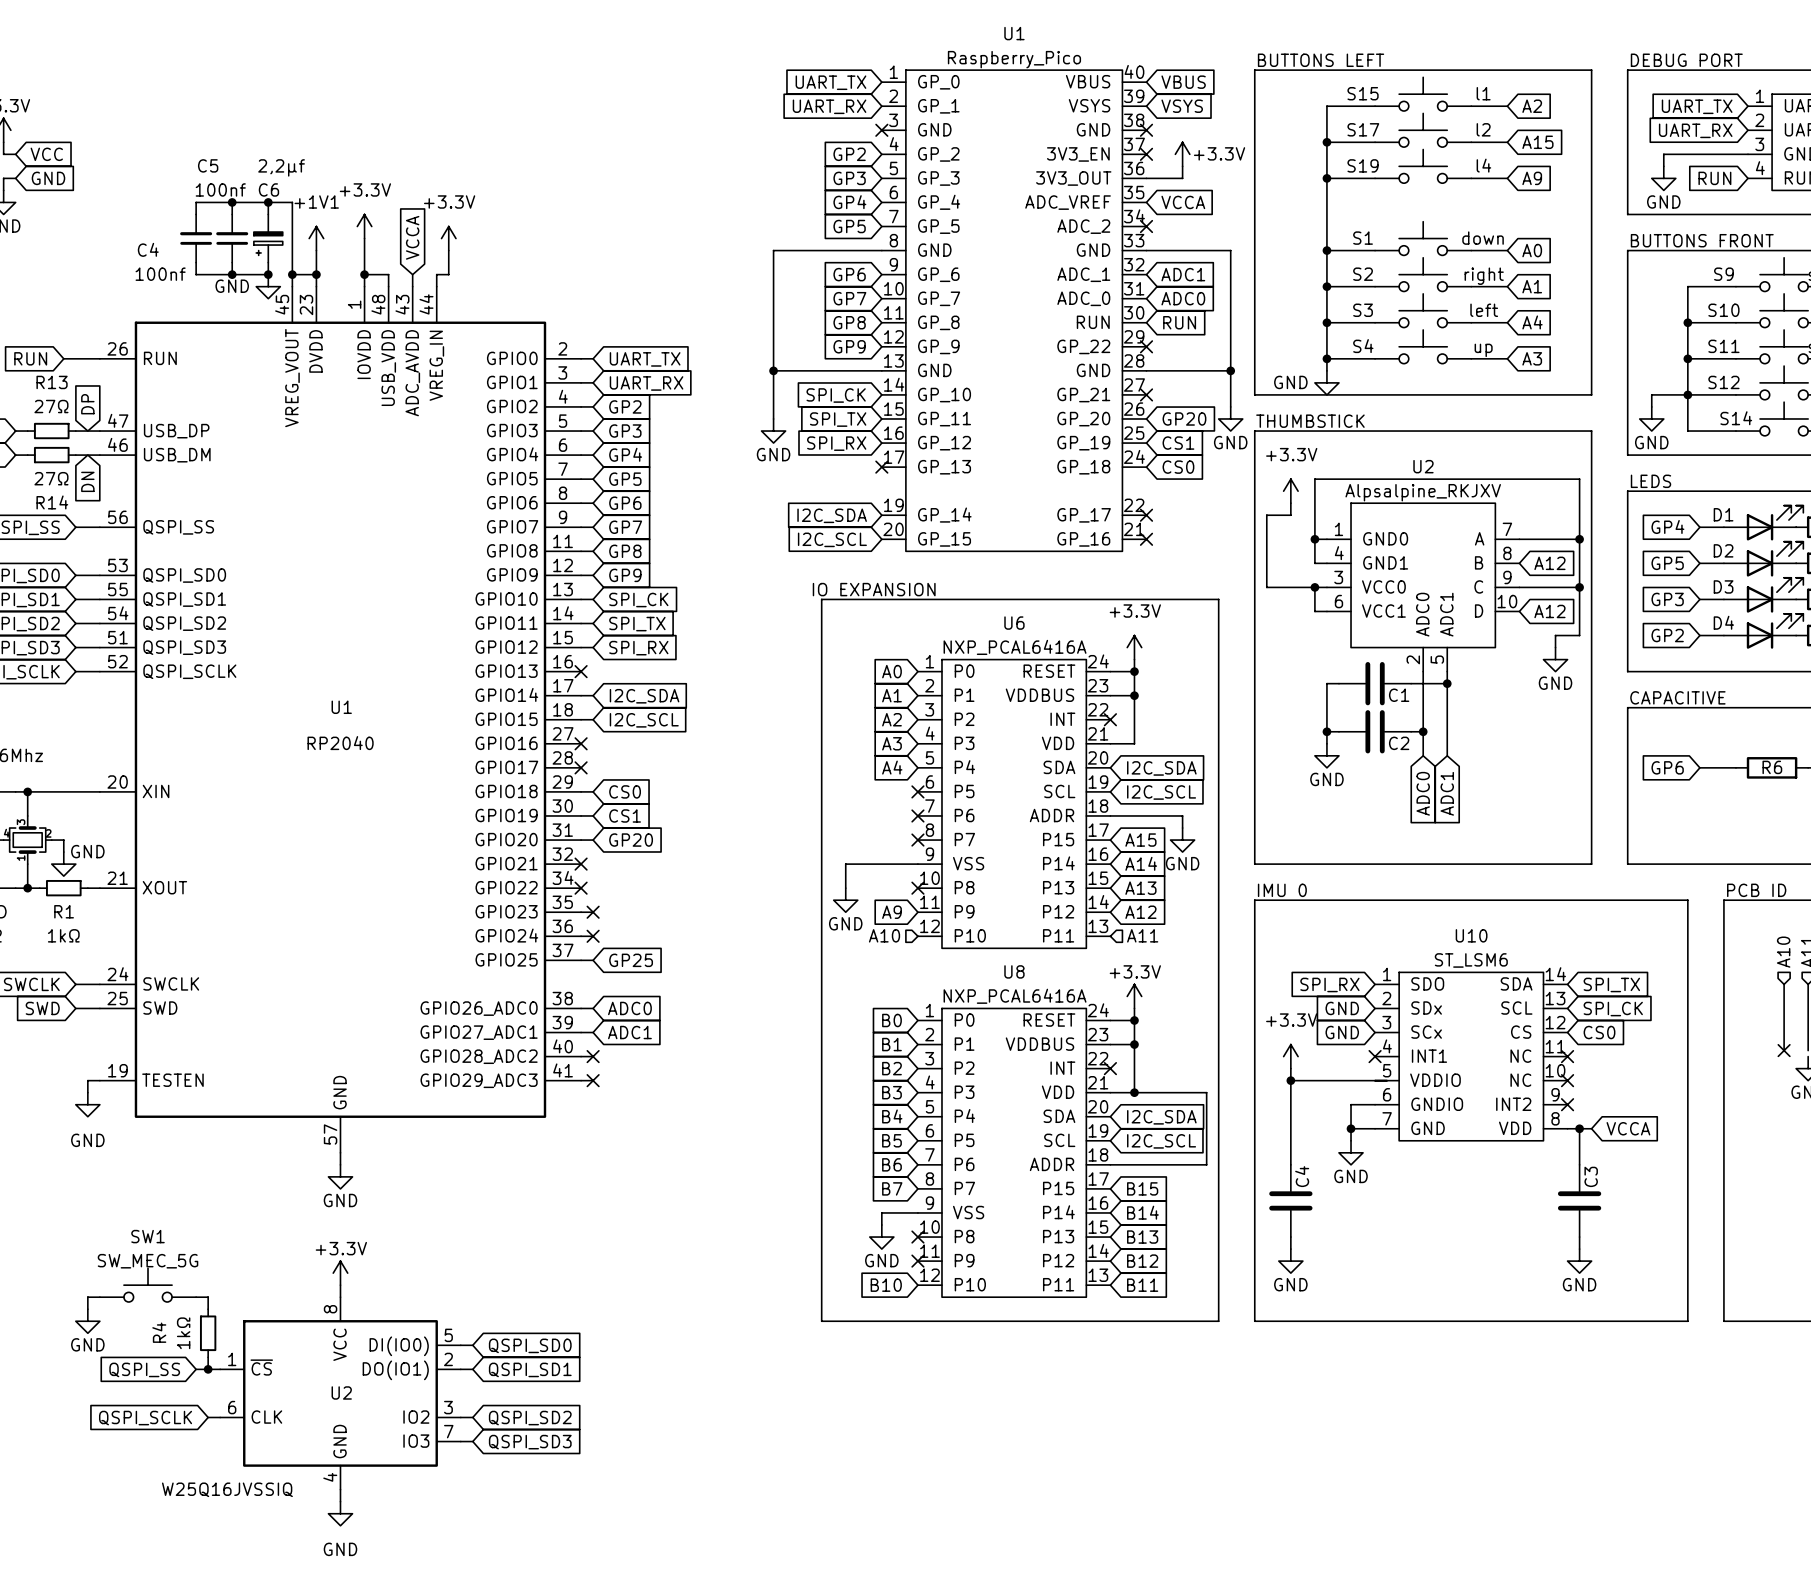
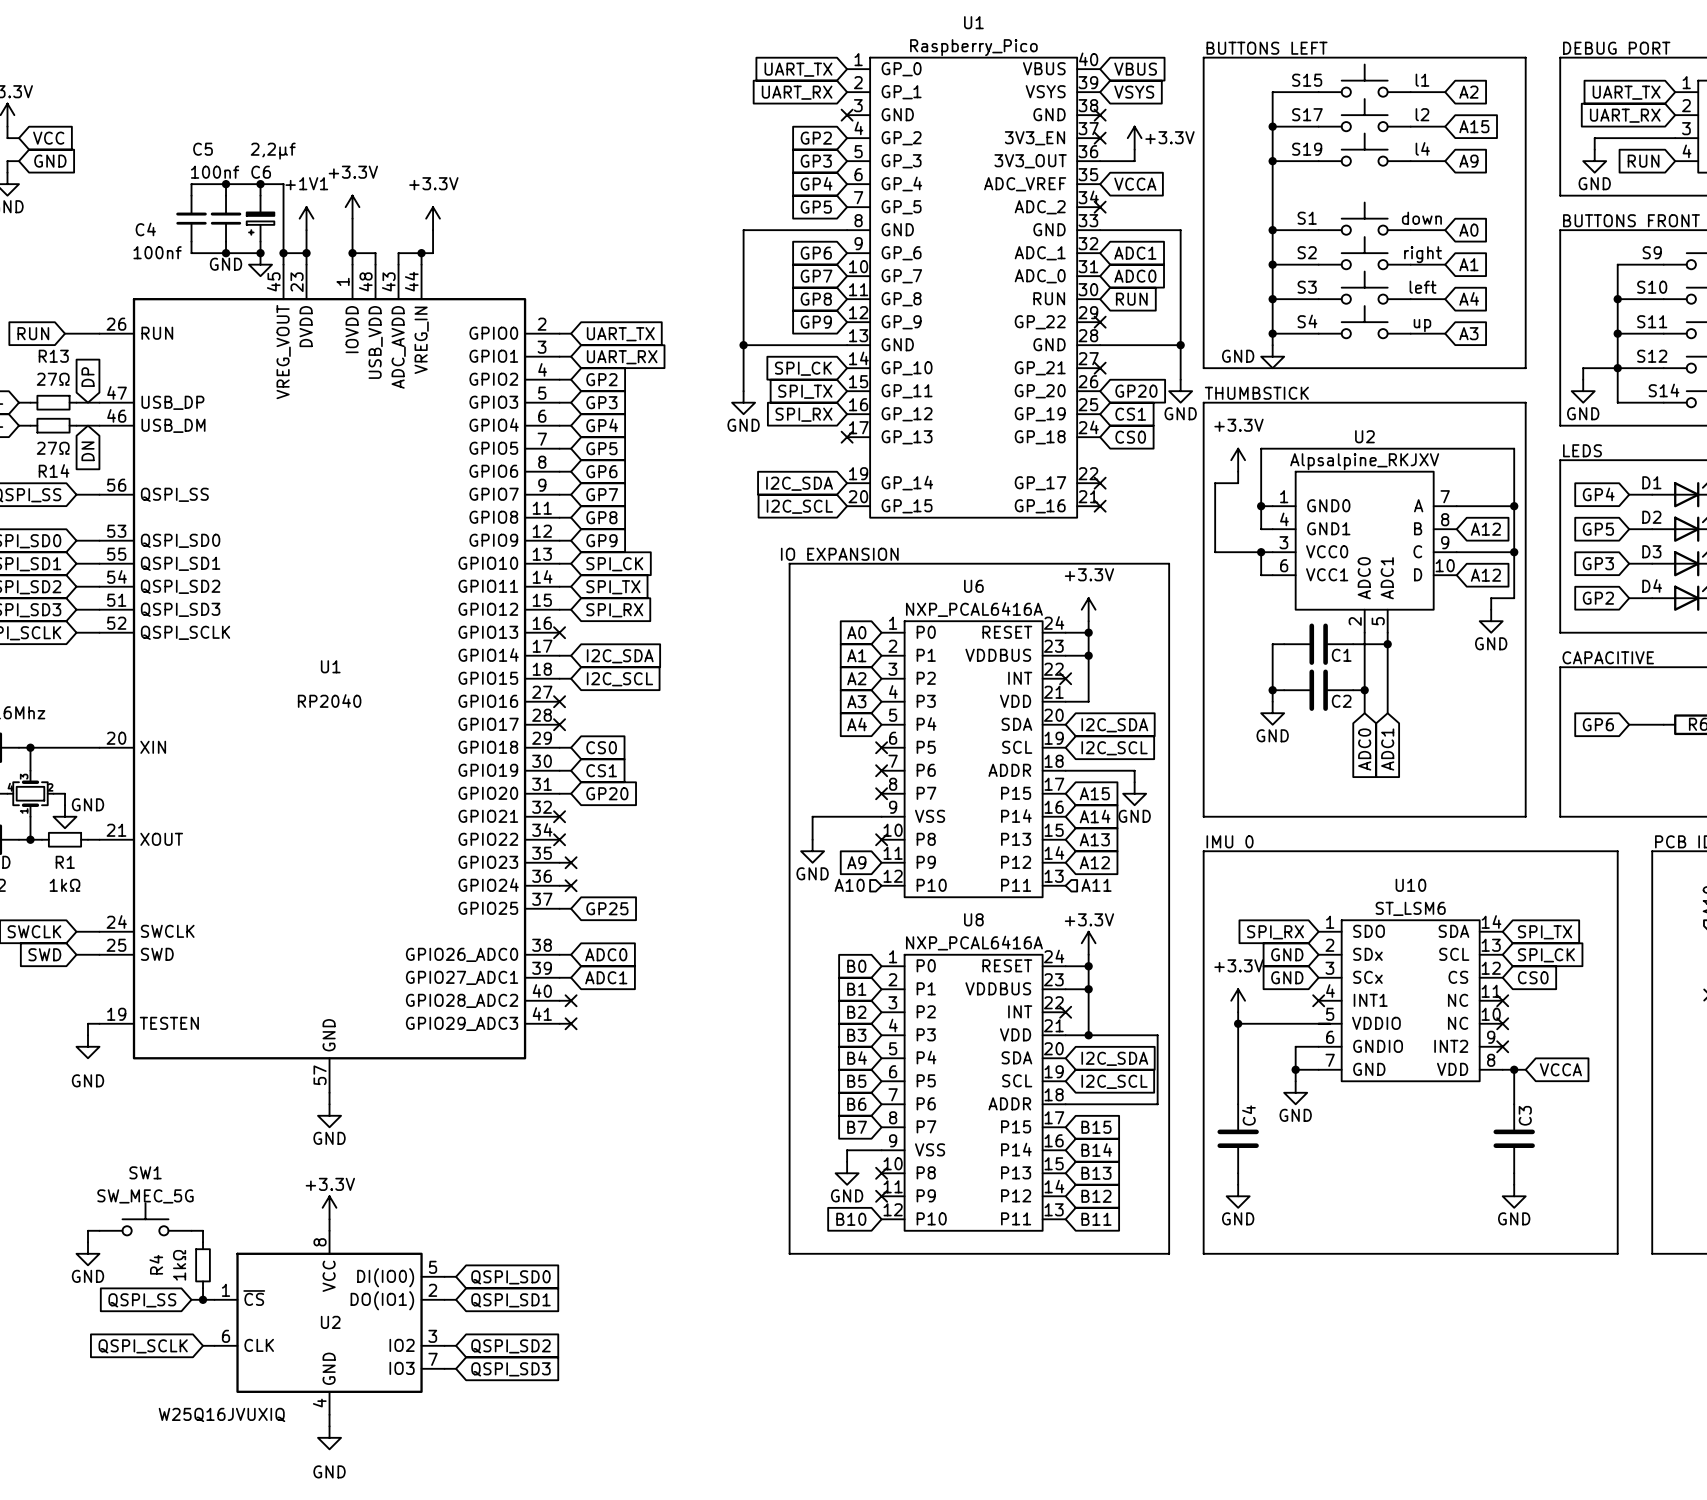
global label: VCCA (412, 237) -> none
wire: none -> (398, 253) (421, 253)
junction: none -> (421, 253)
U2 value: W25Q16JVSSIQ (227, 1489) -> W25Q16JVUXIQ (221, 1414)

